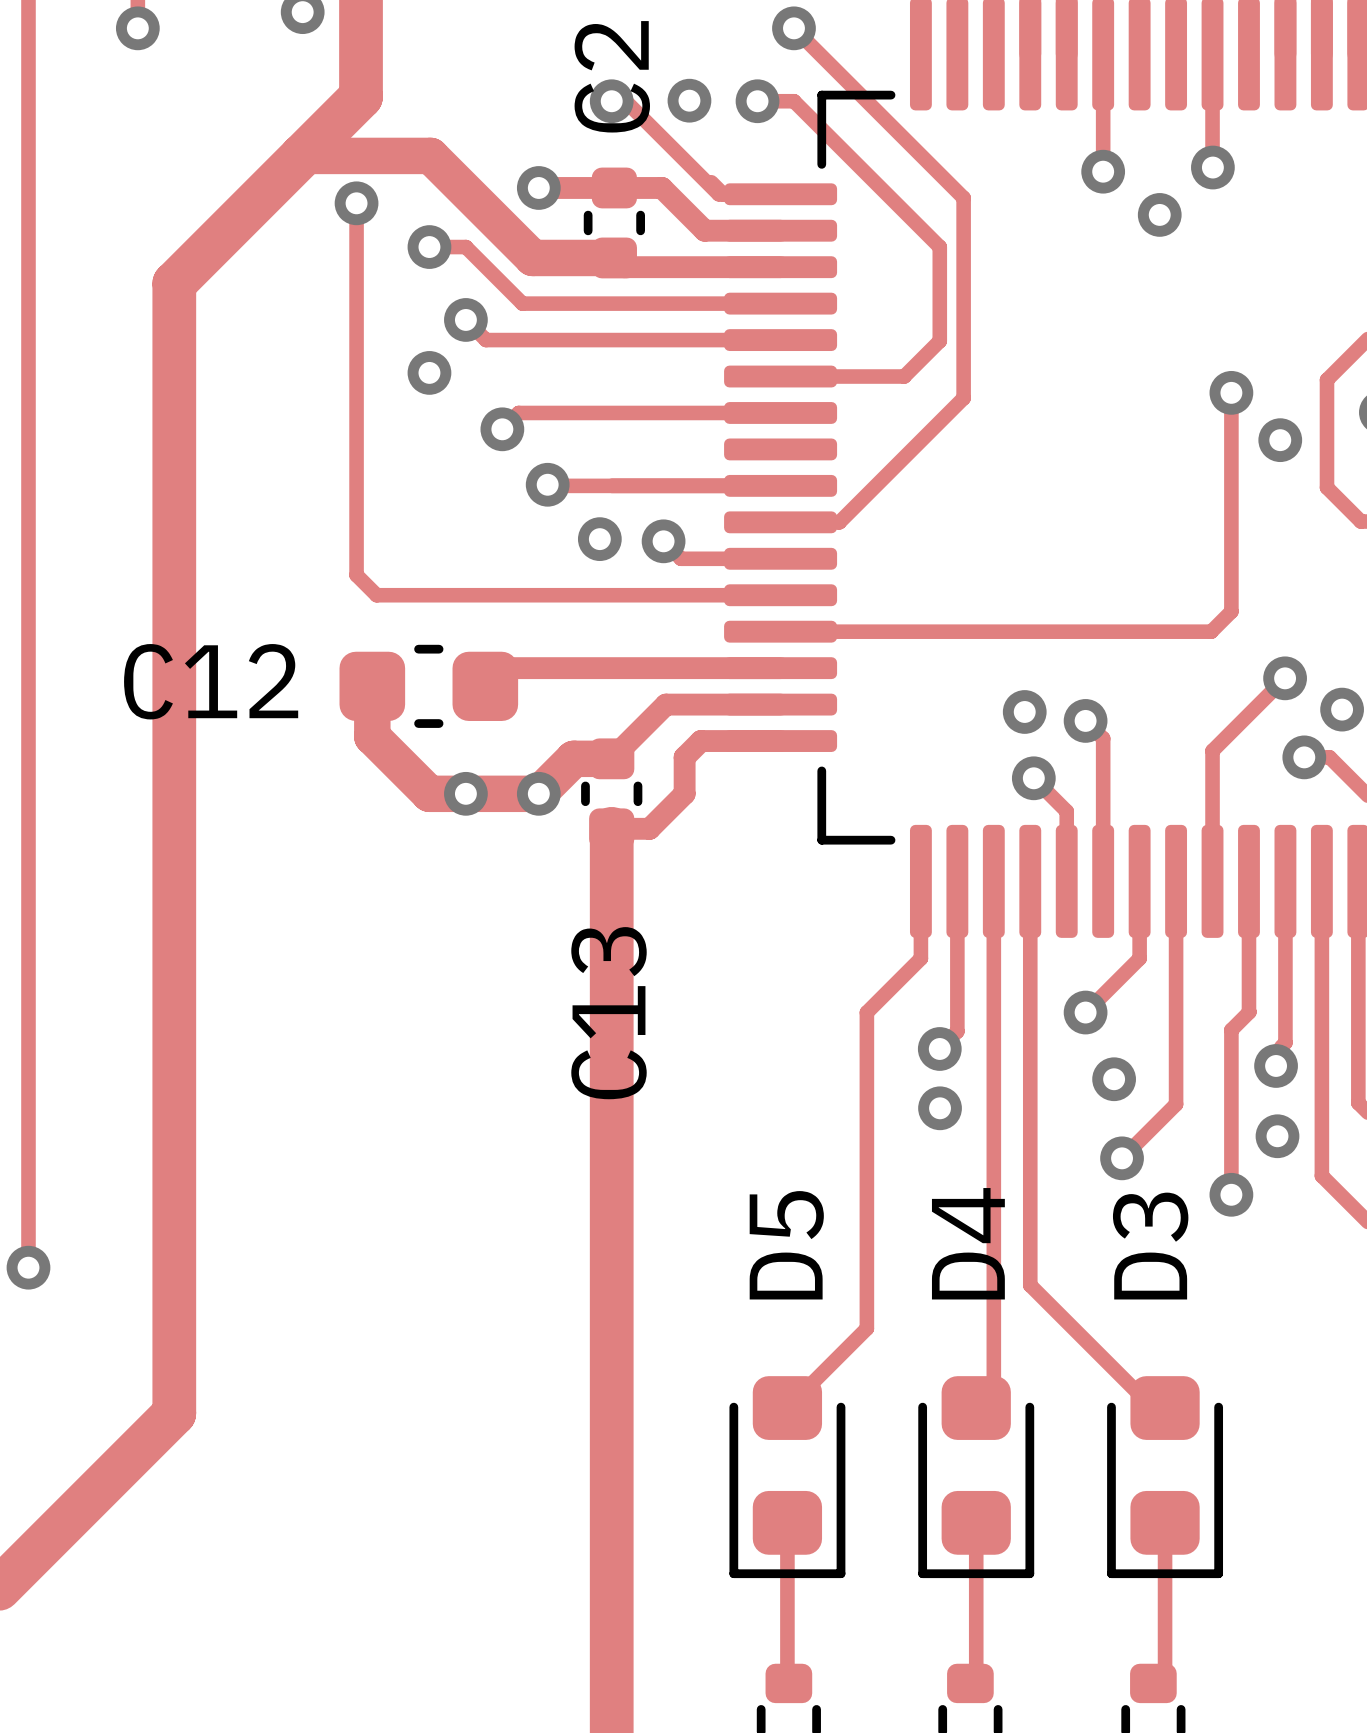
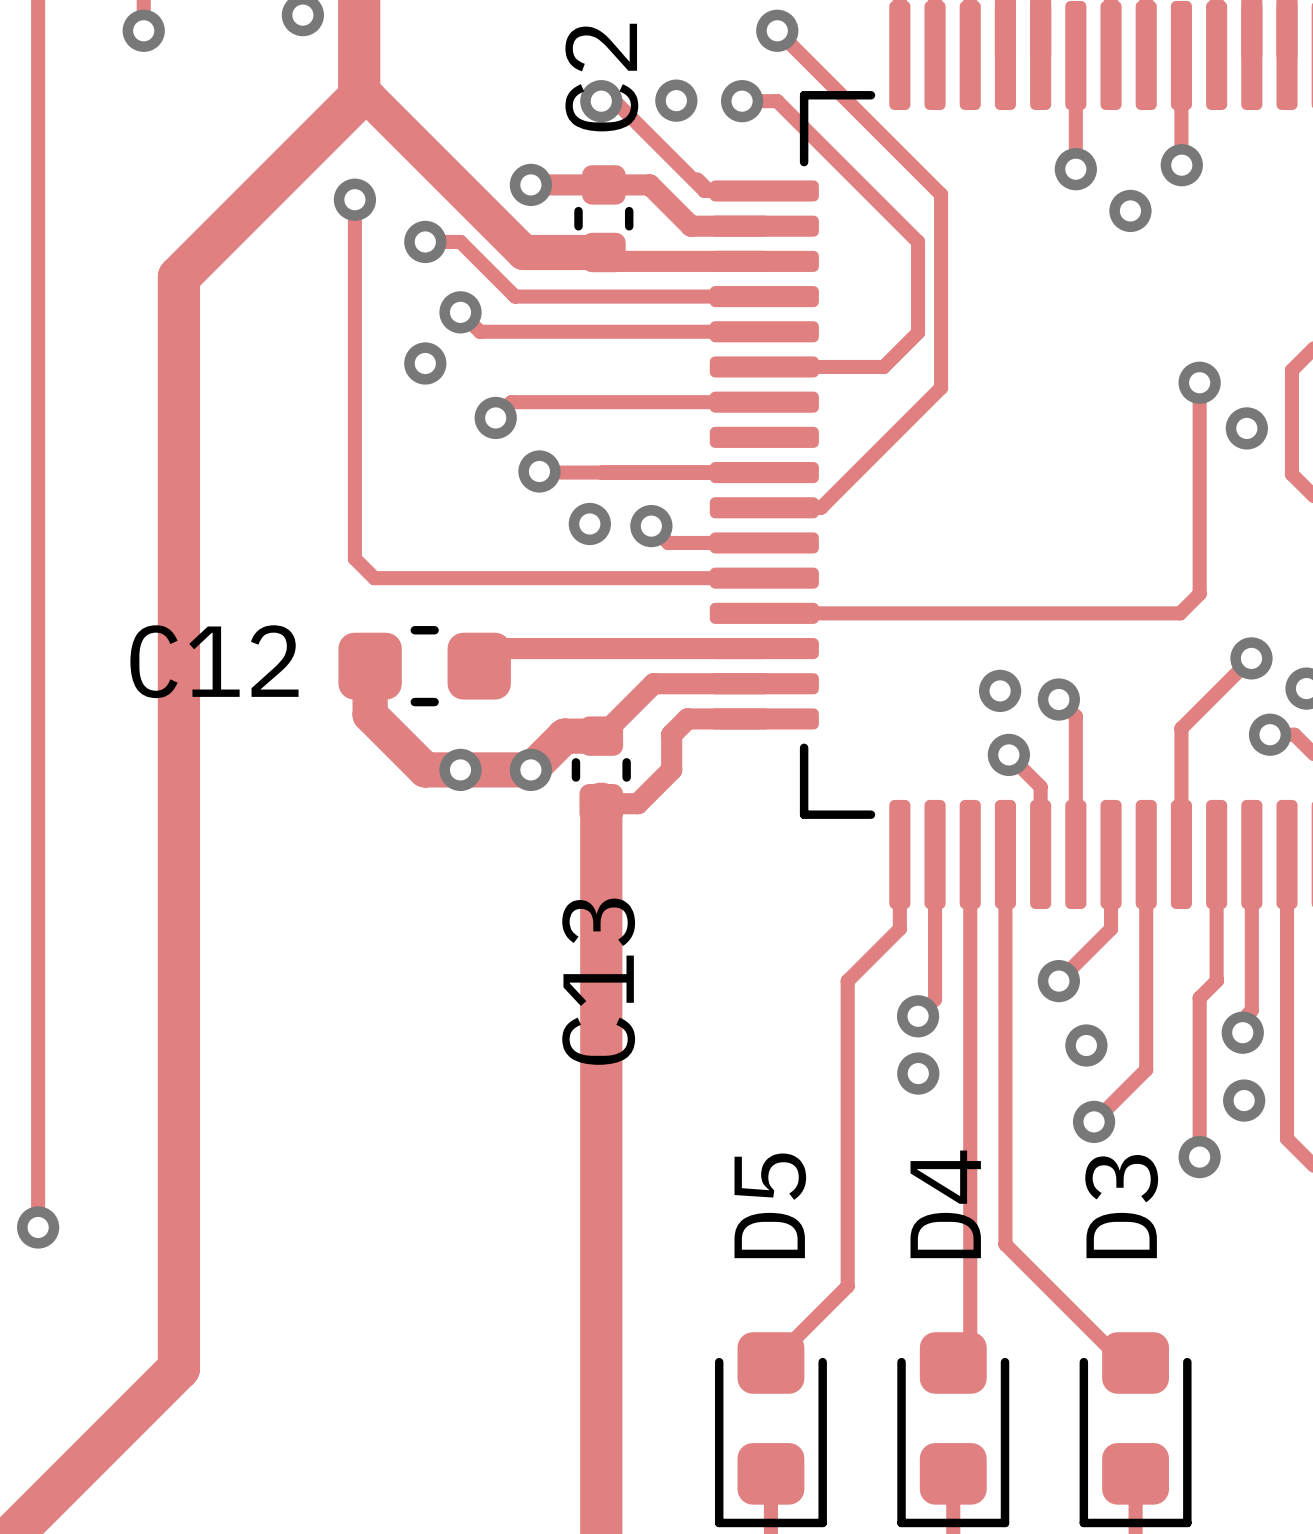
track: (301, 155) (430, 155) (532, 257) -> (359, 96) (368, 96) (523, 252)

